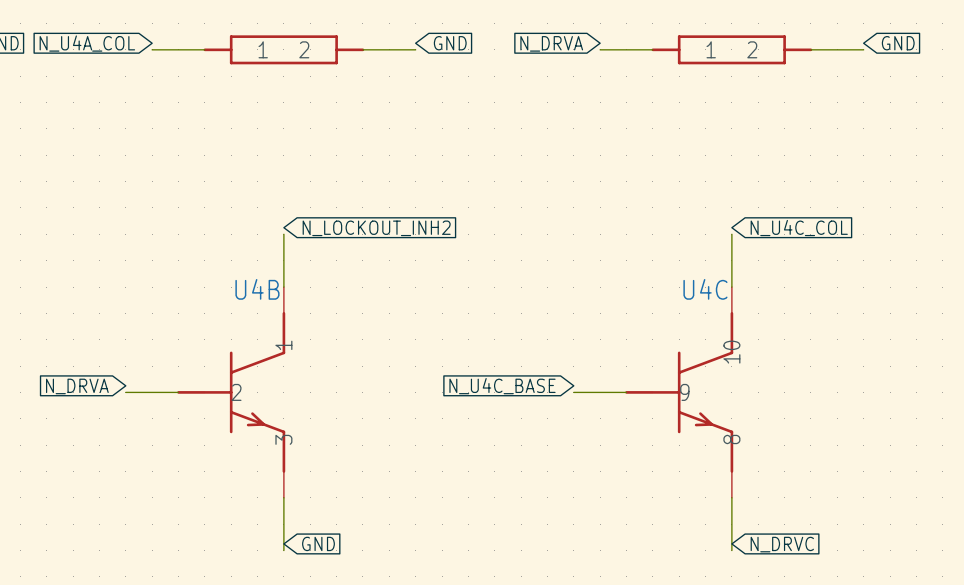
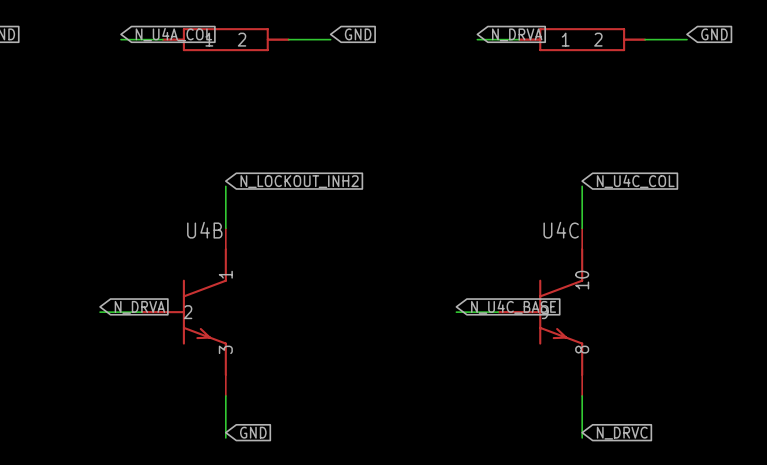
global label rotation: 0° (87, 43) -> 180° (173, 34)
global label rotation: 0° (551, 43) -> 180° (517, 34)
global label rotation: 0° (77, 386) -> 180° (139, 307)
global label rotation: 0° (502, 386) -> 180° (513, 307)

